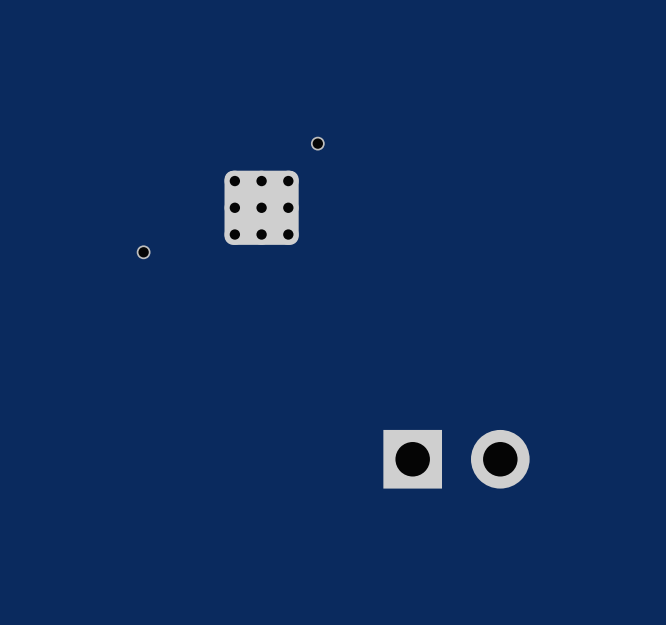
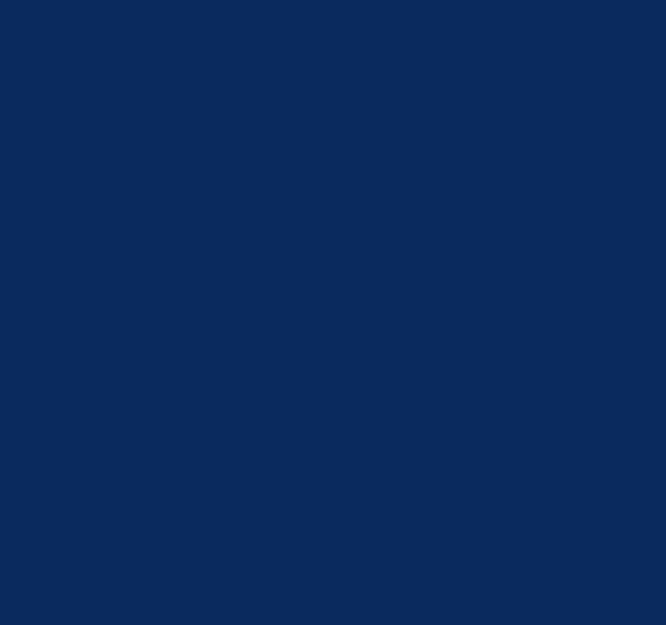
via: (317, 143) -> none
part: (261, 207) -> none
via: (143, 252) -> none
part: (456, 459) -> none

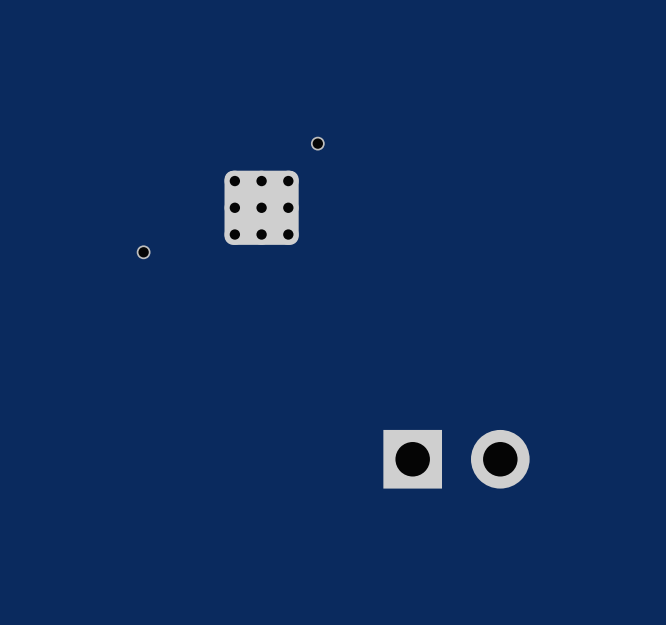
via: none -> (317, 143)
part: none -> (261, 207)
via: none -> (143, 252)
part: none -> (456, 459)

